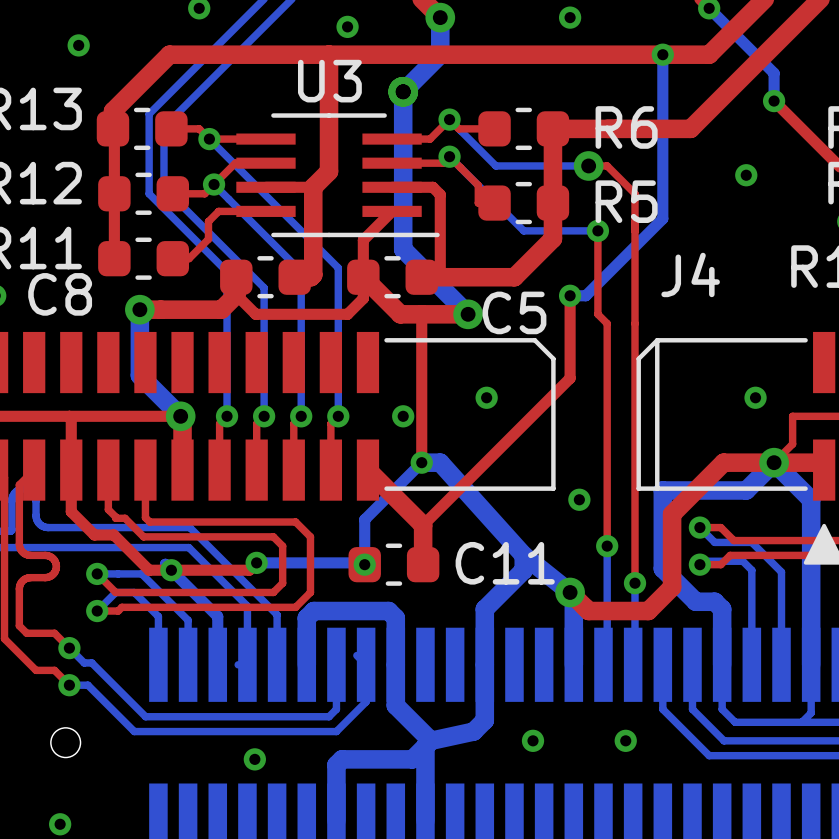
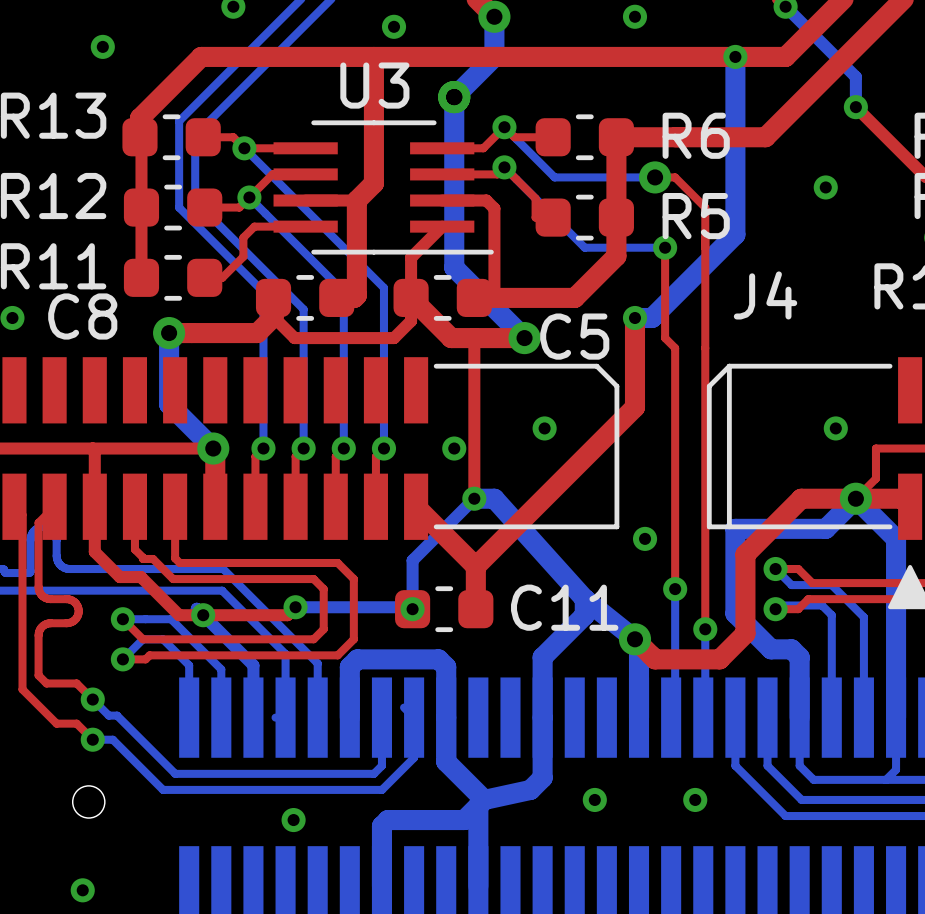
bottom track width: thin (662, 54) (662, 218) (585, 295) (570, 295) -> thick (735, 56) (735, 234) (652, 317) (634, 317)
top track width: thin (570, 295) (570, 378) (423, 525) -> thick (634, 317) (634, 407) (475, 566)

